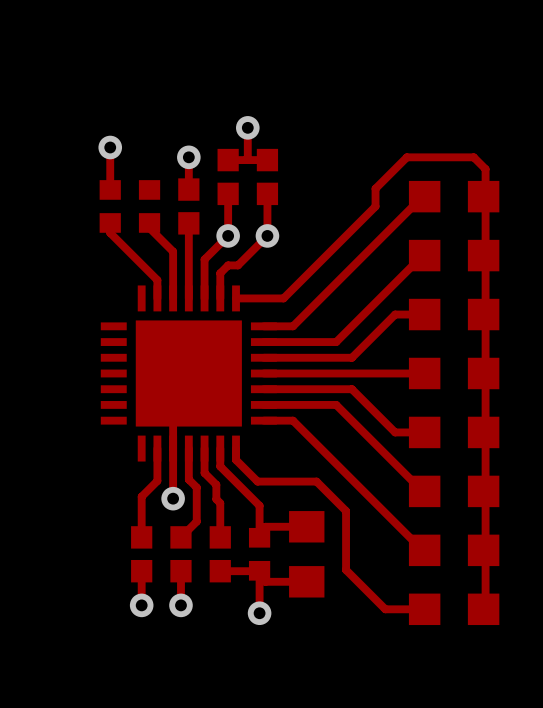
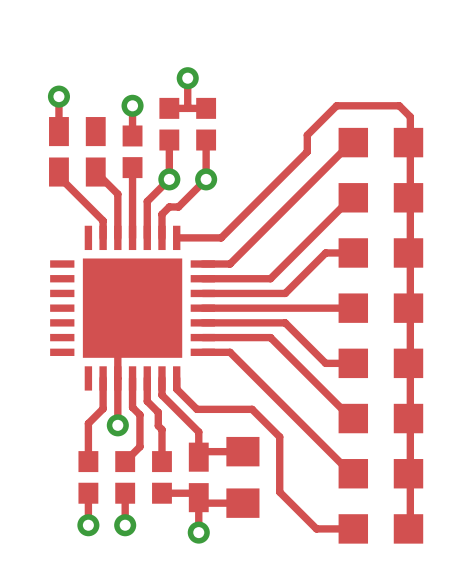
part footprint: [99, 180, 121, 233] -> [49, 117, 69, 187]
part footprint: [138, 180, 161, 233] -> [85, 117, 106, 187]
part footprint: [248, 527, 271, 581] -> [188, 442, 209, 513]

